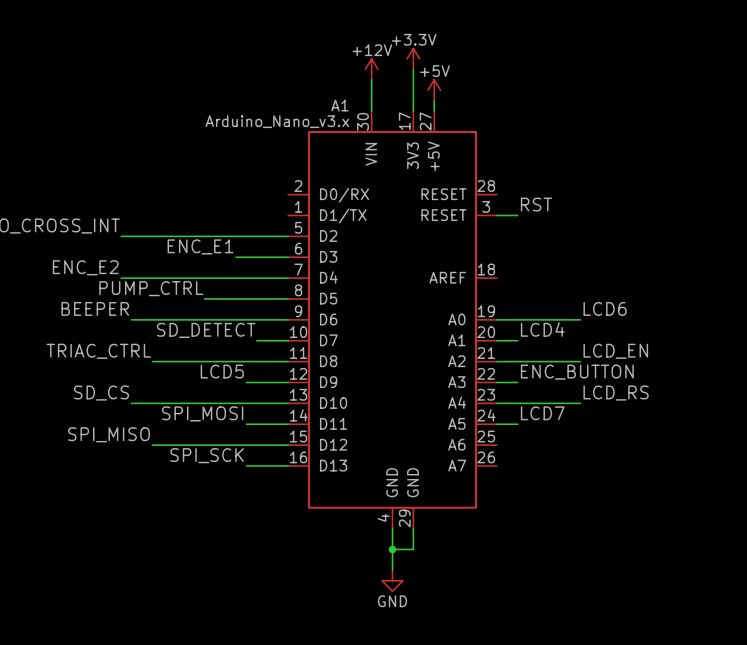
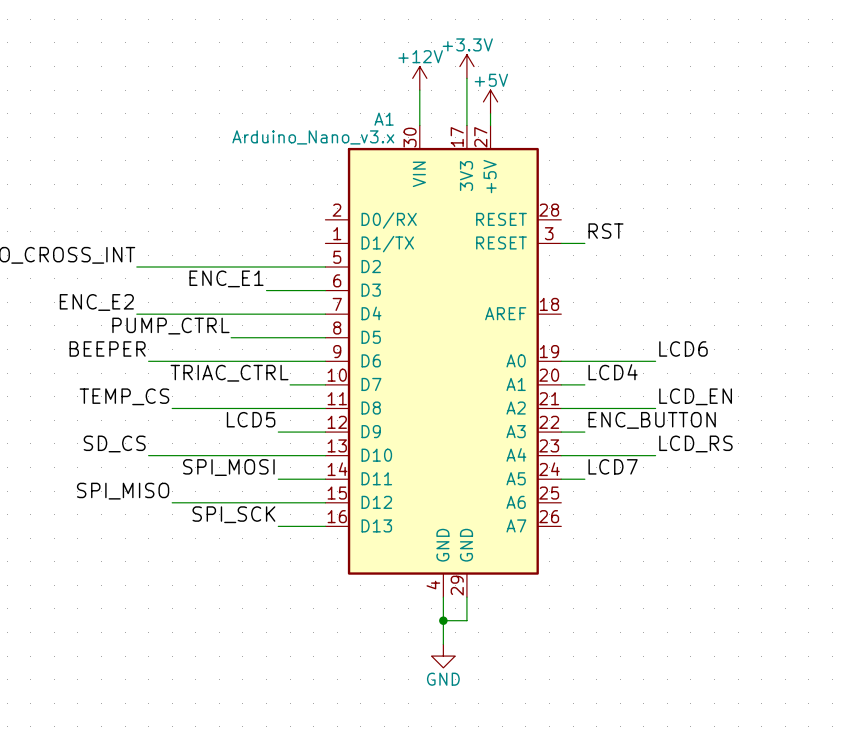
label: SD_DETECT (206, 330) -> TRIAC_CTRL (229, 373)
label: TRIAC_CTRL (98, 351) -> TEMP_CS (124, 396)

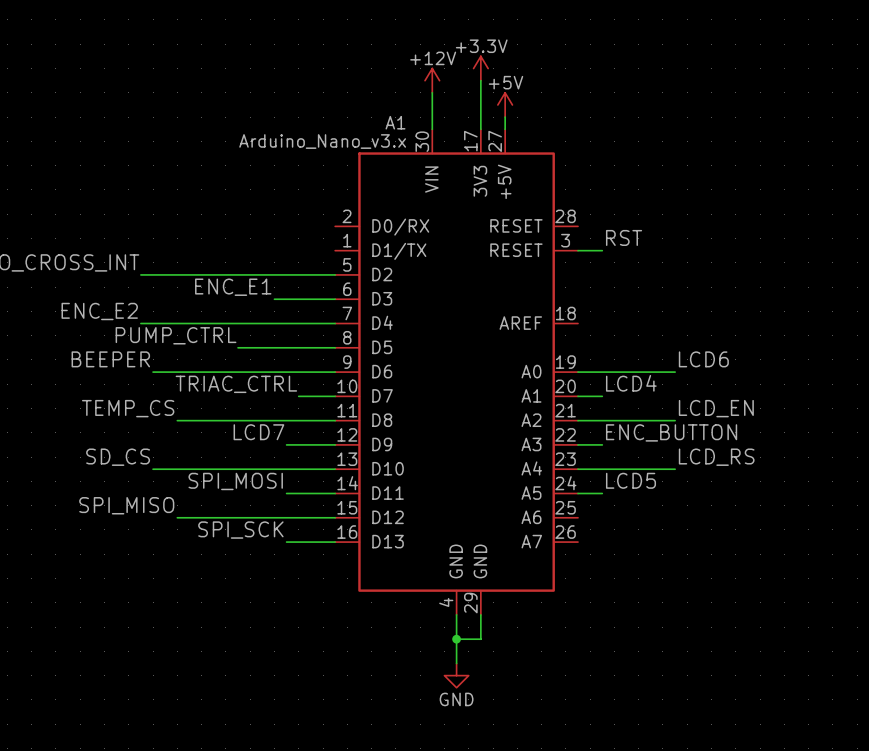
label: LCD5 (251, 419) -> LCD7 (258, 432)
label: LCD7 (613, 466) -> LCD5 (630, 480)

